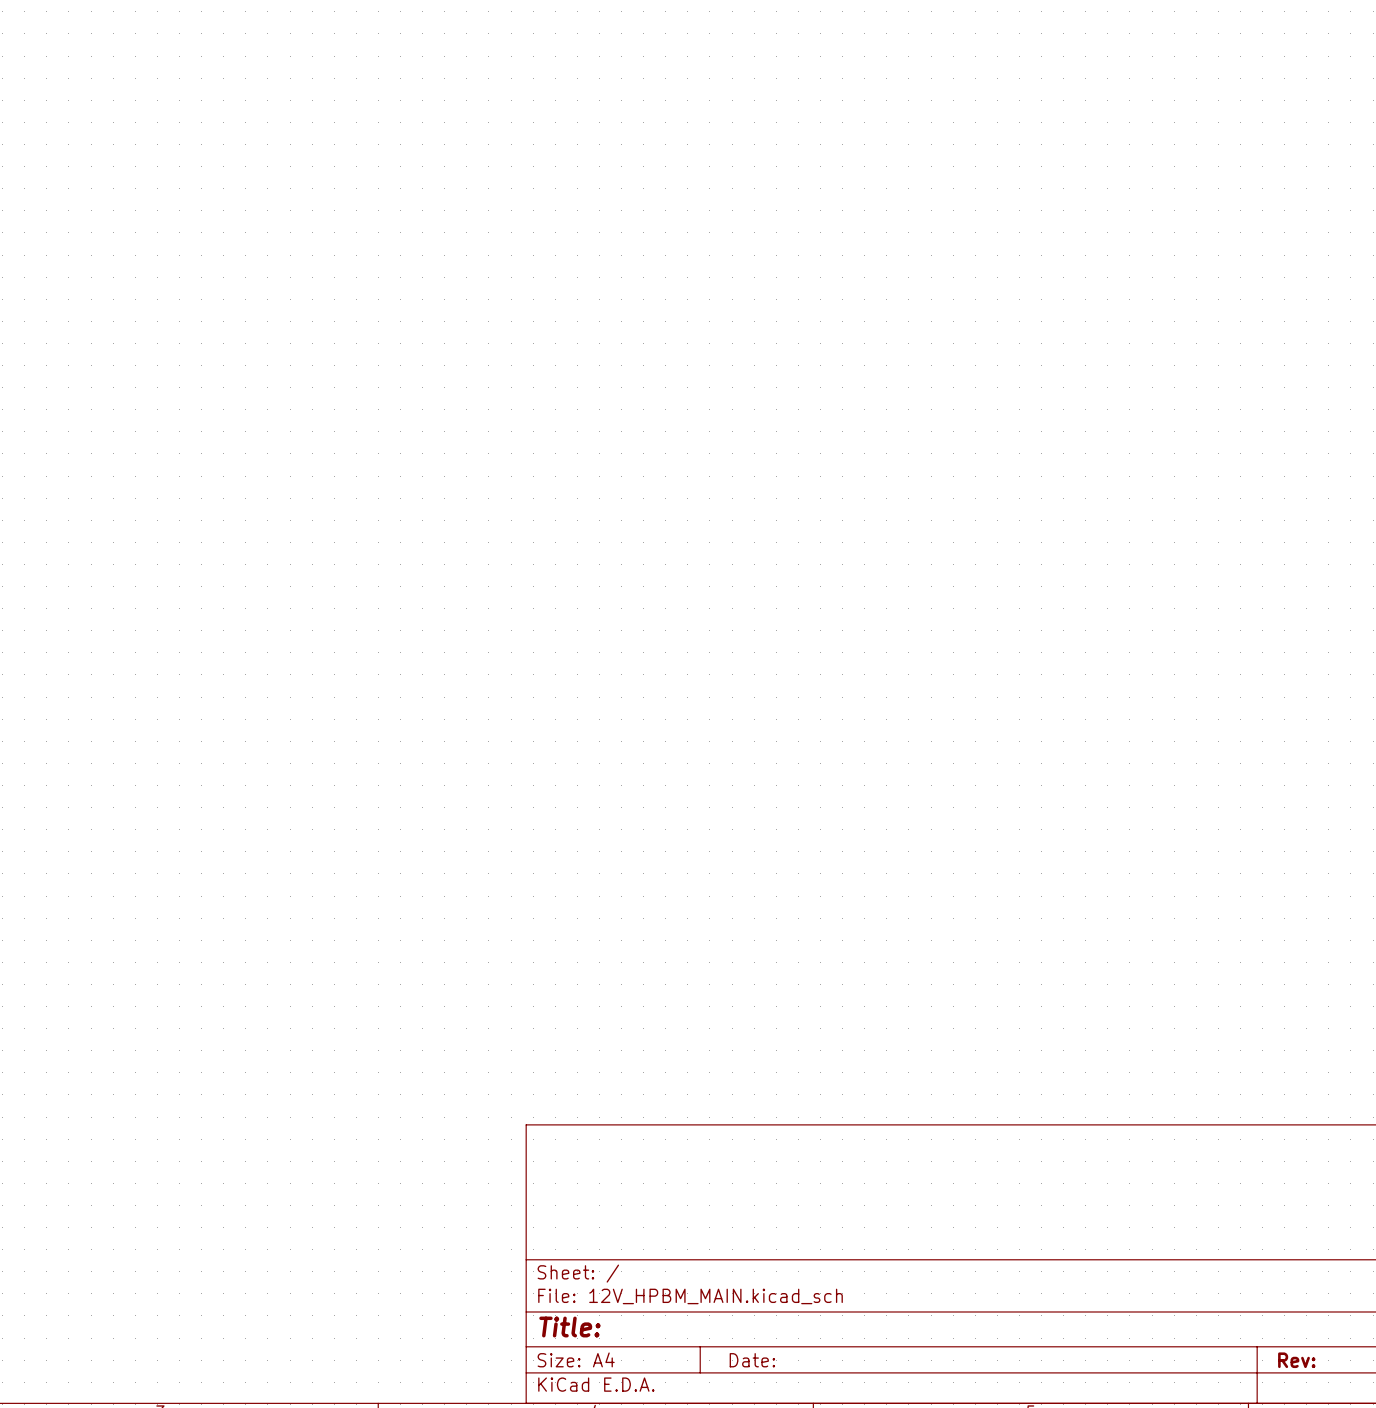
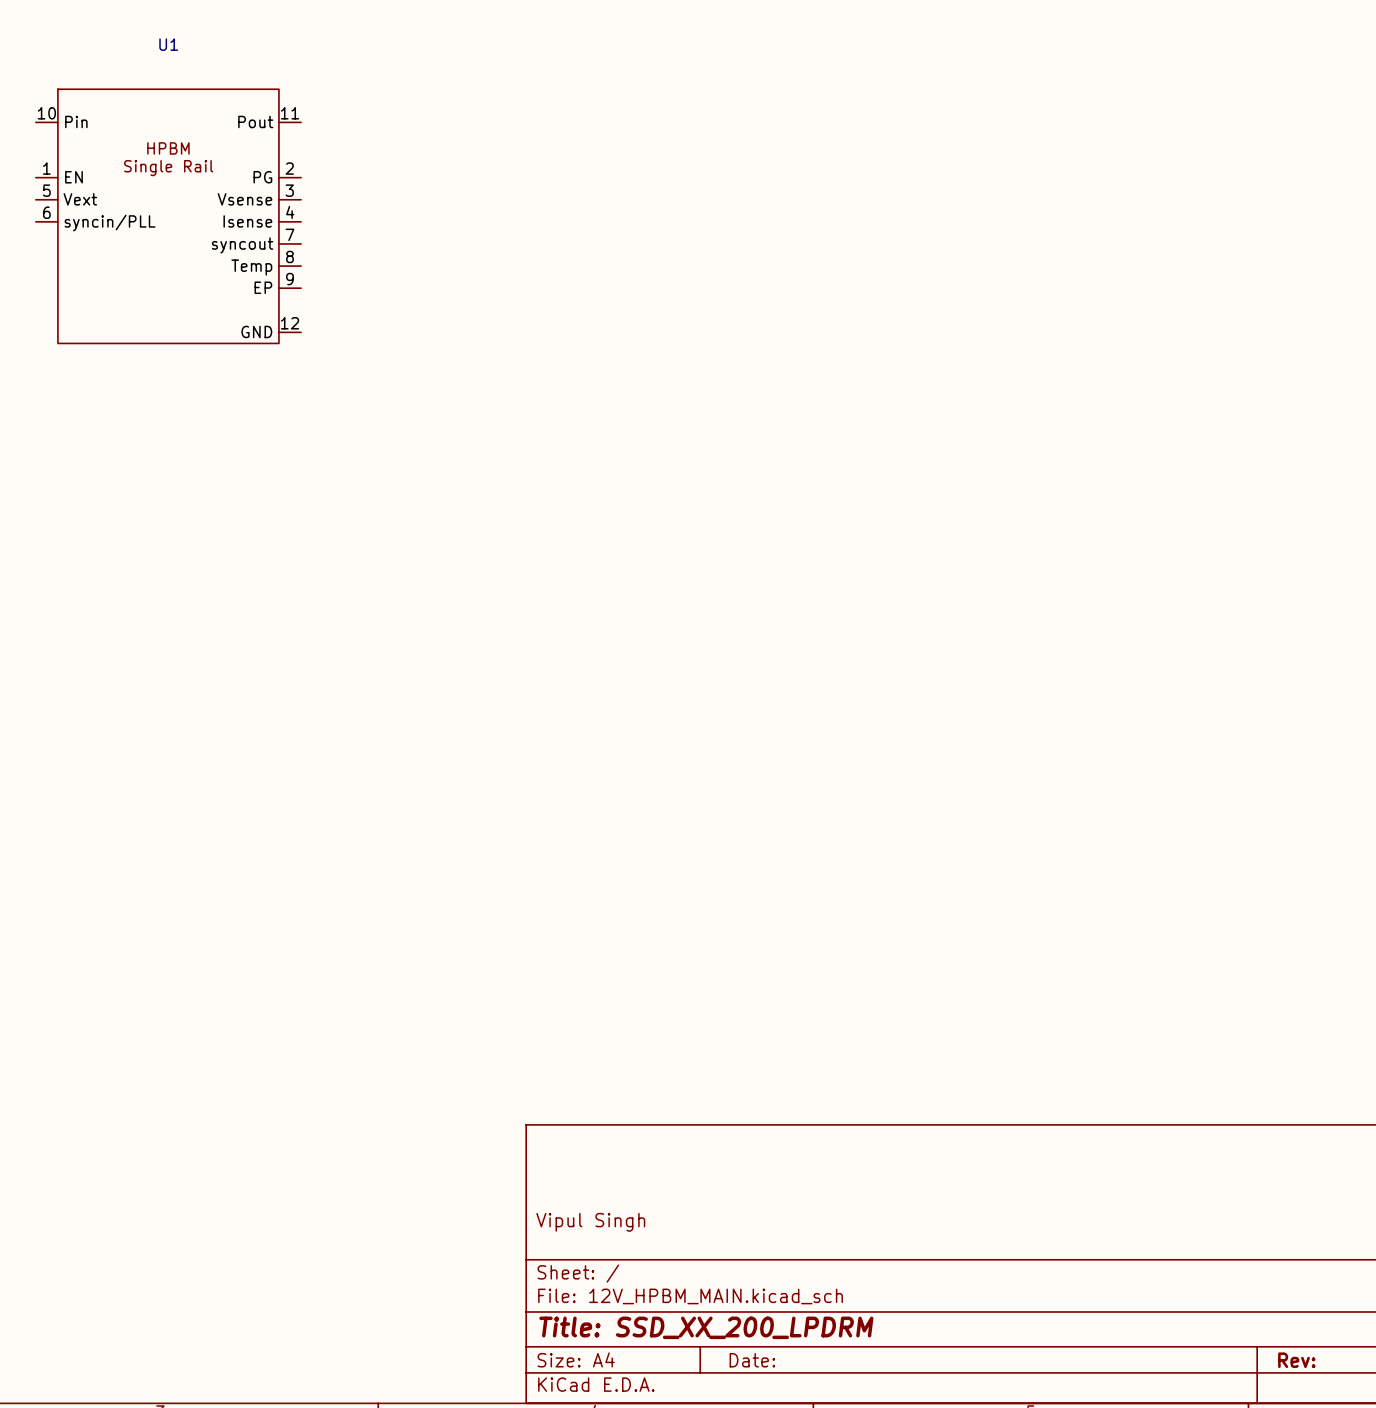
U1: none -> (168, 216)
title block: none -> Vipul Singh (590, 1222)
title block: Title: (569, 1327) -> Title: SSD_XX_200_LPDRM (706, 1327)

